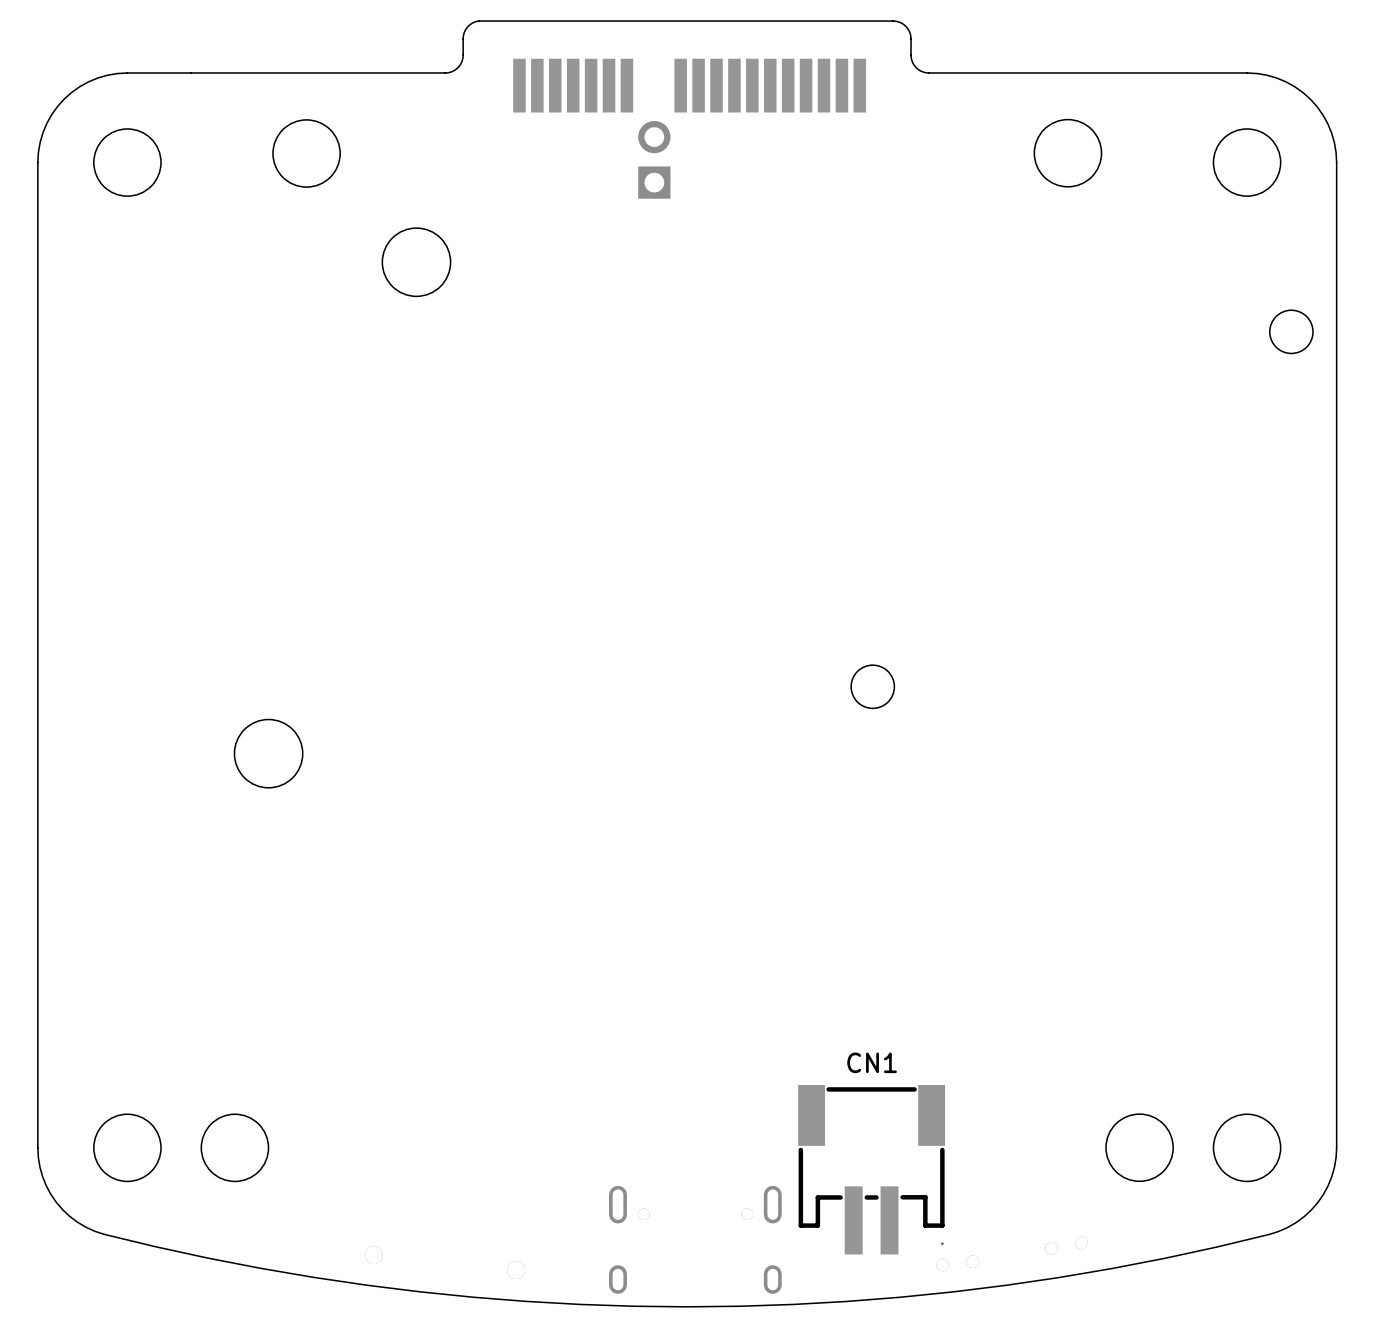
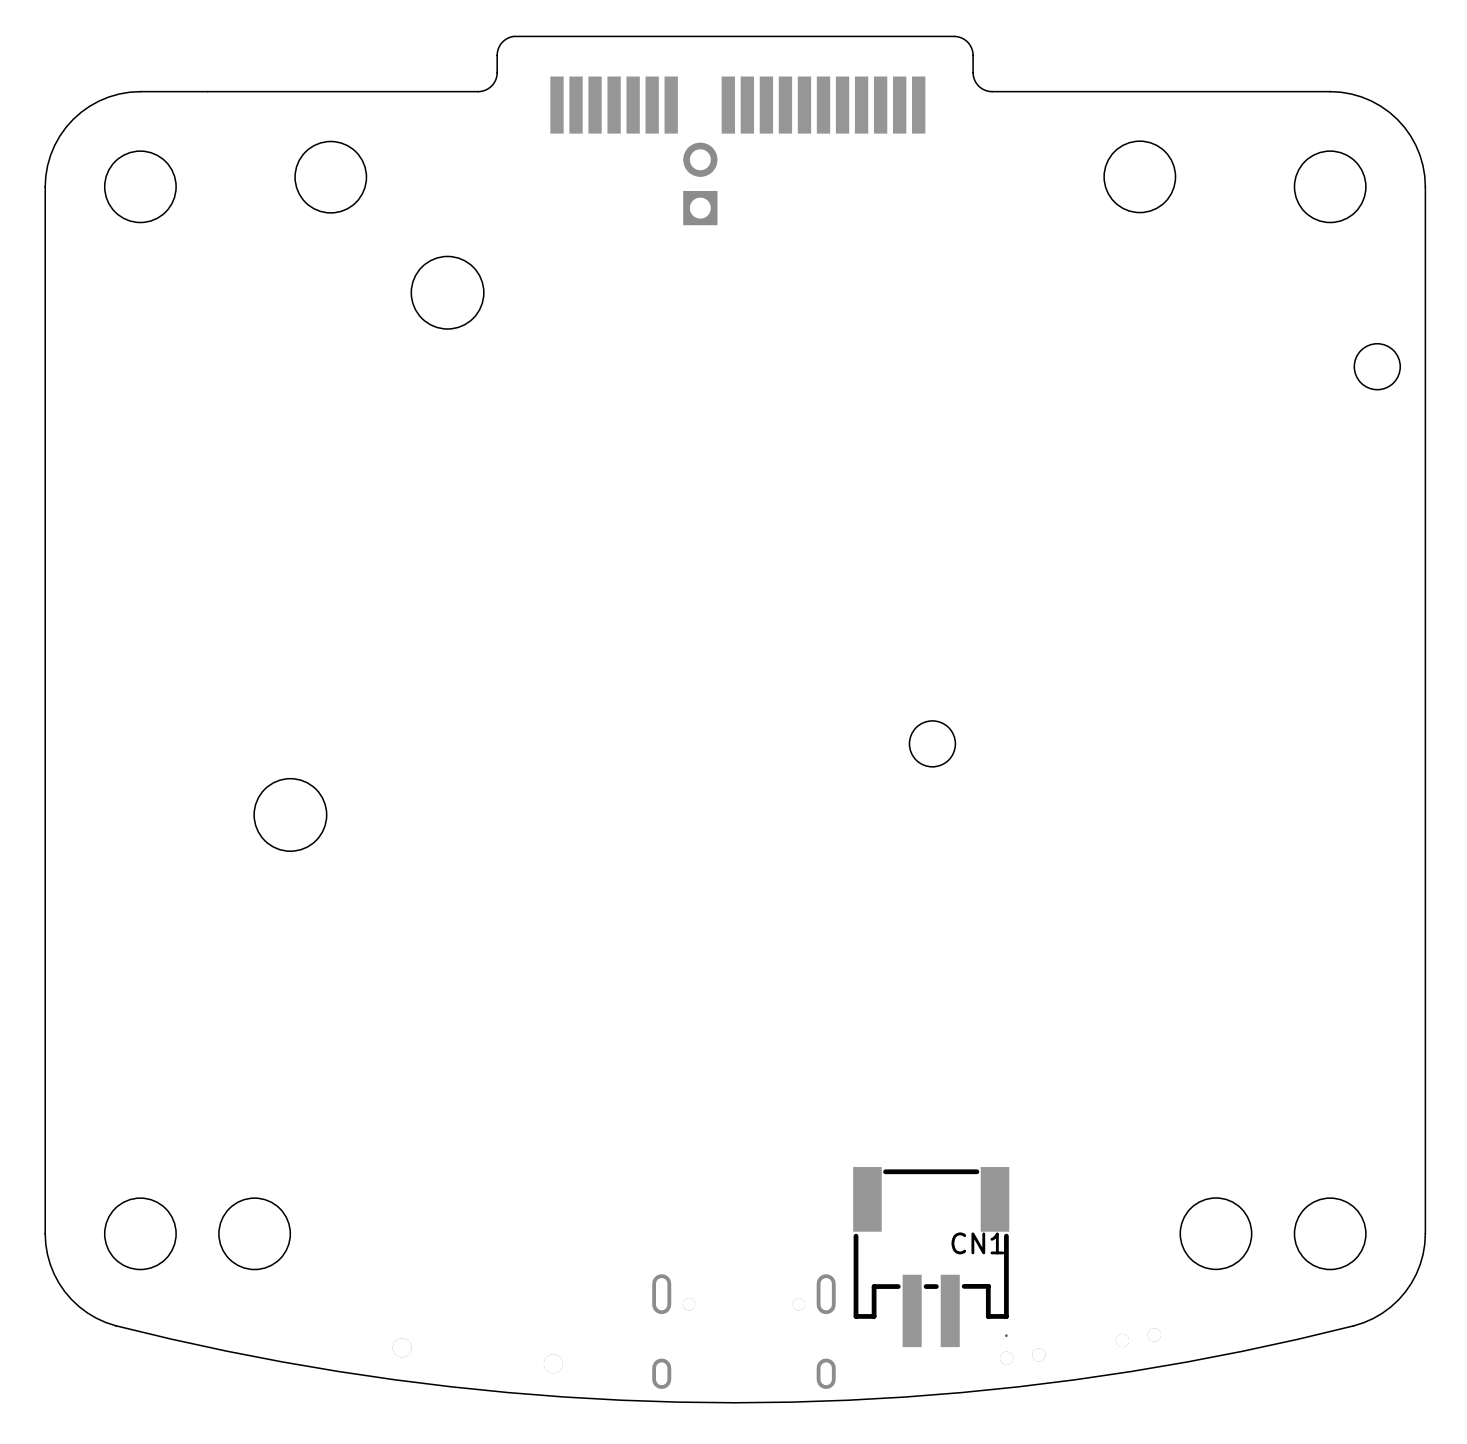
CN1 name position: CN1 (872, 1062) -> CN1 (977, 1243)

